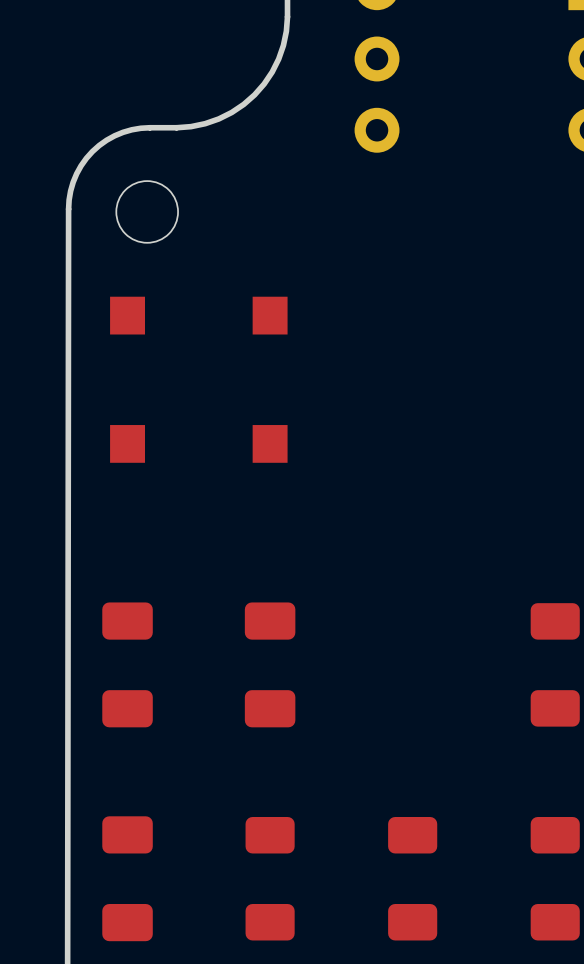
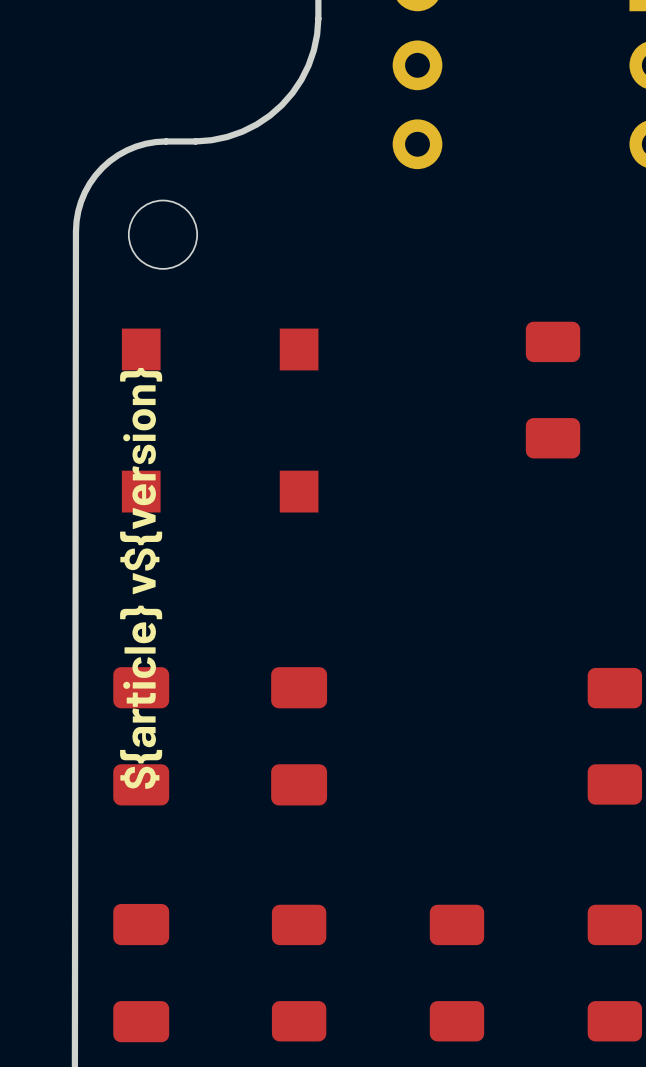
part: none -> (553, 390)
text: none -> ${article} v${version} (141, 578)

